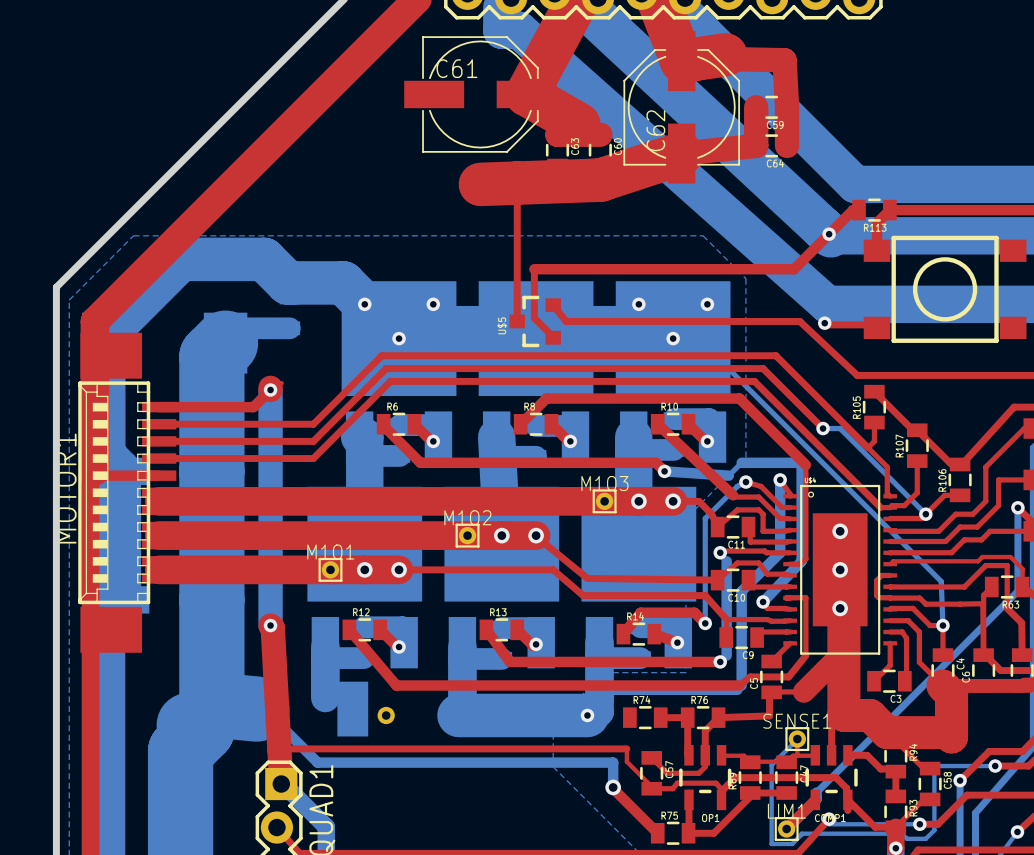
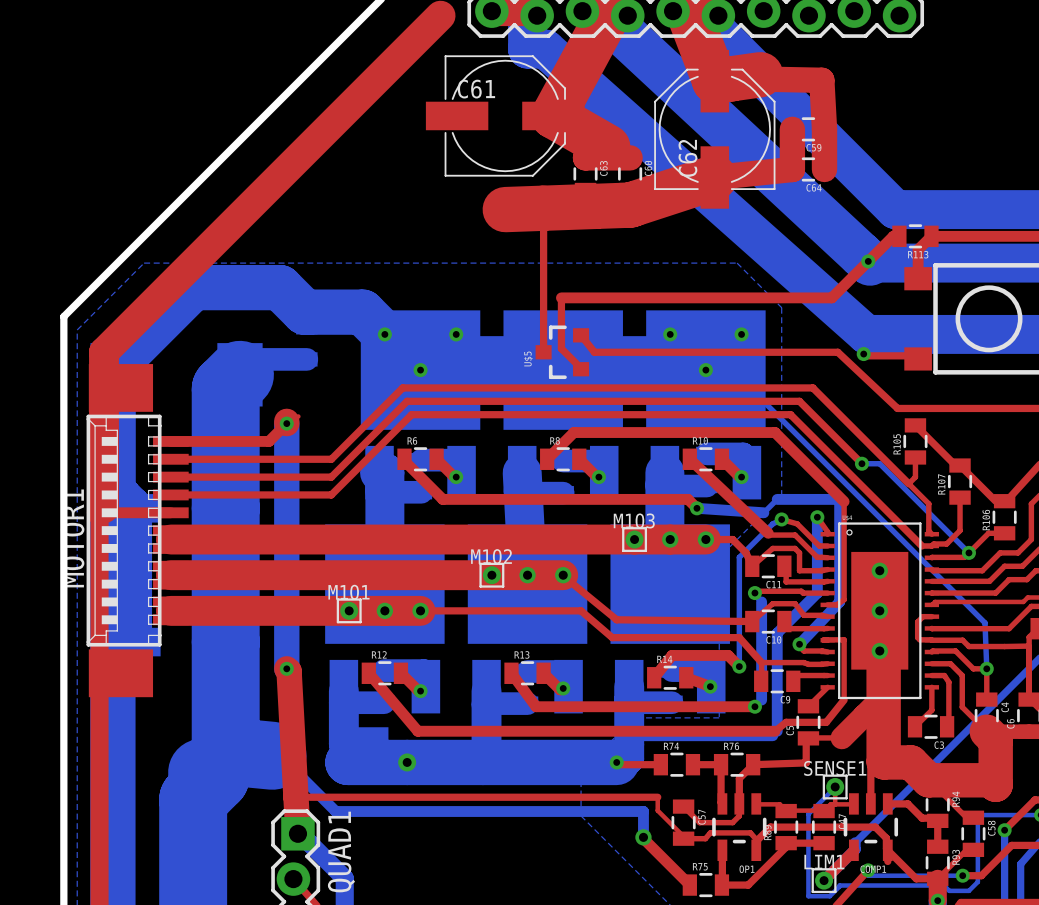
bottom track: none -> (372, 755) (347, 762) (482, 762)
top track: none -> (618, 764) (660, 764)

